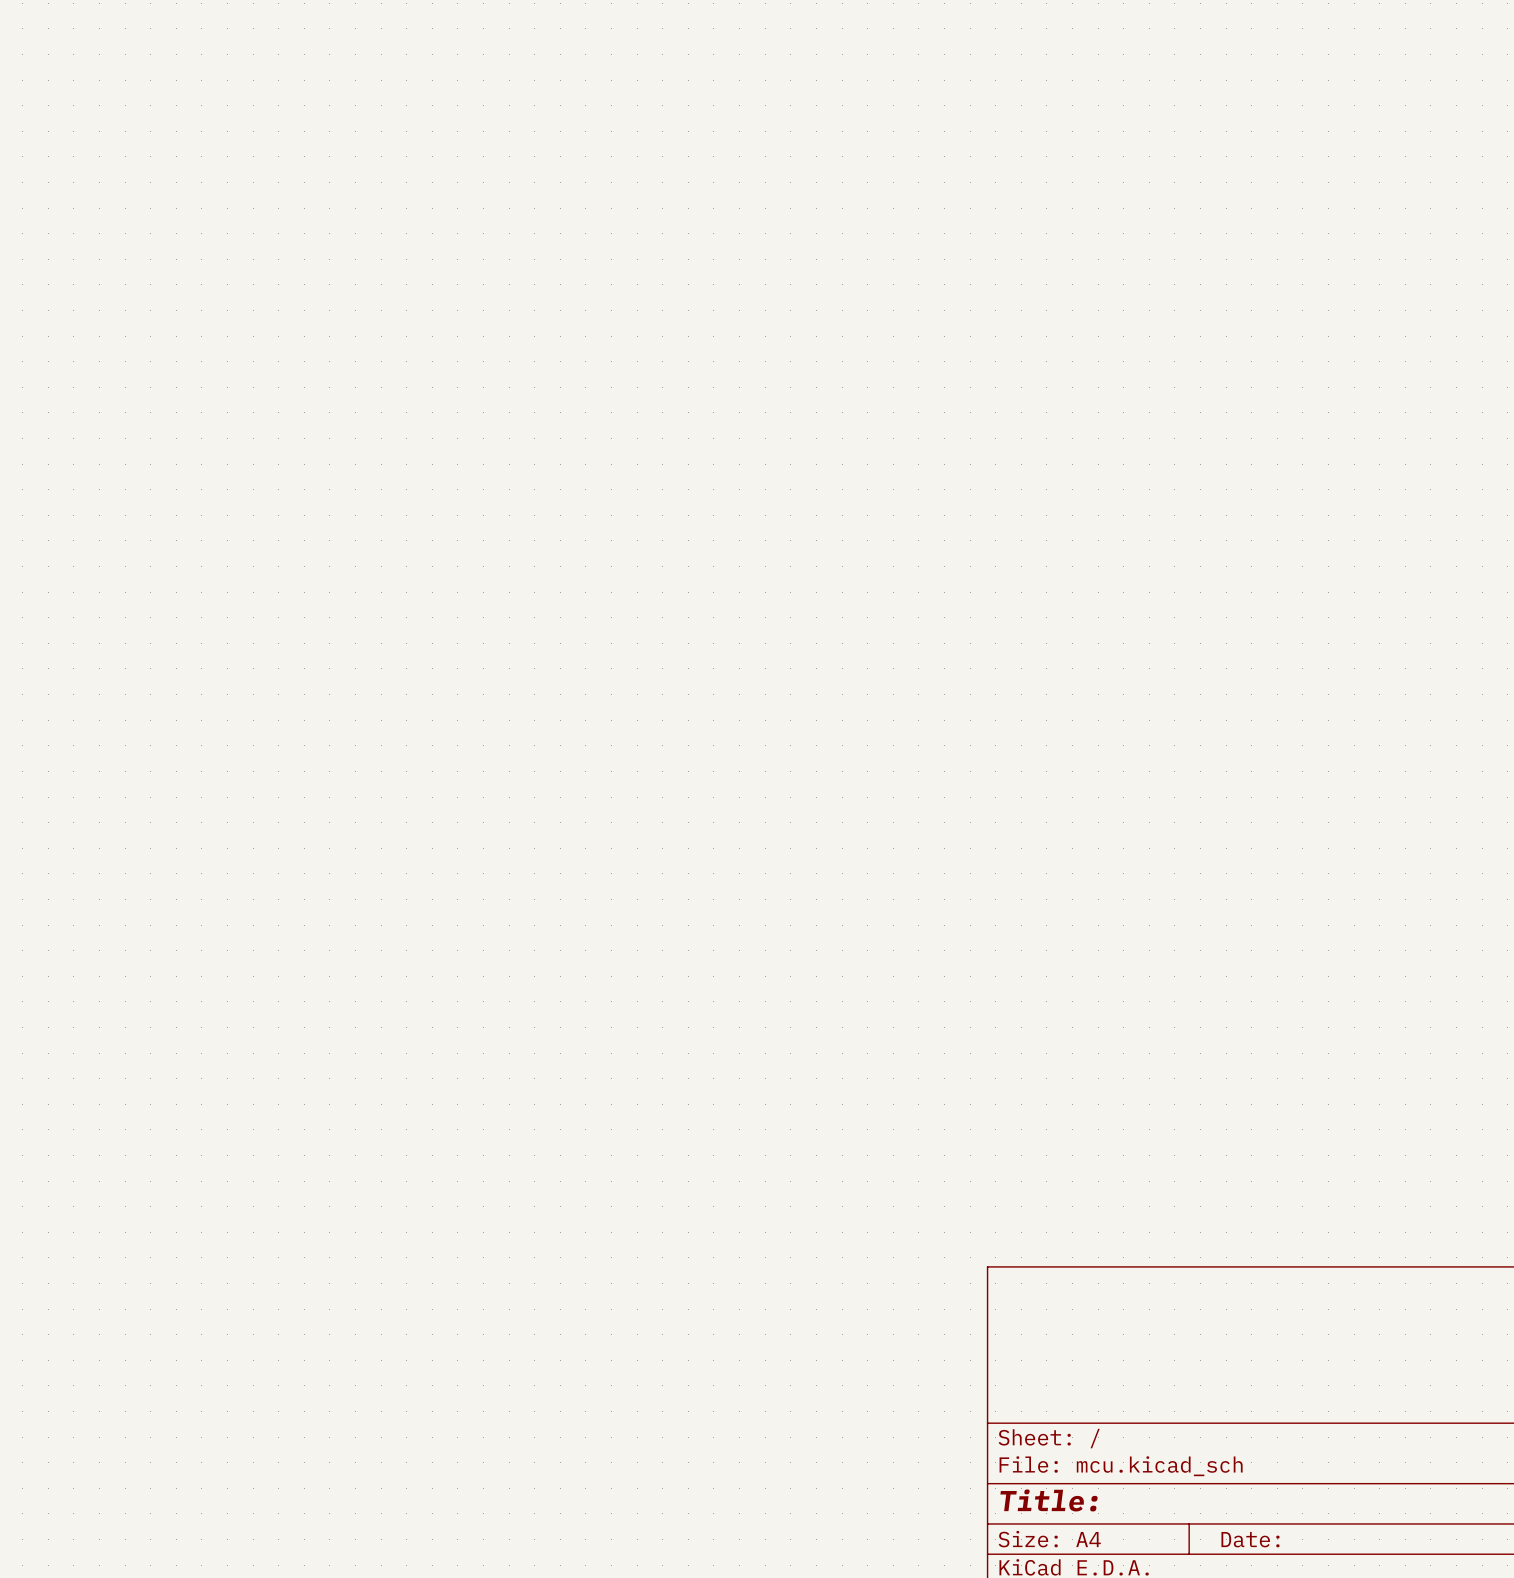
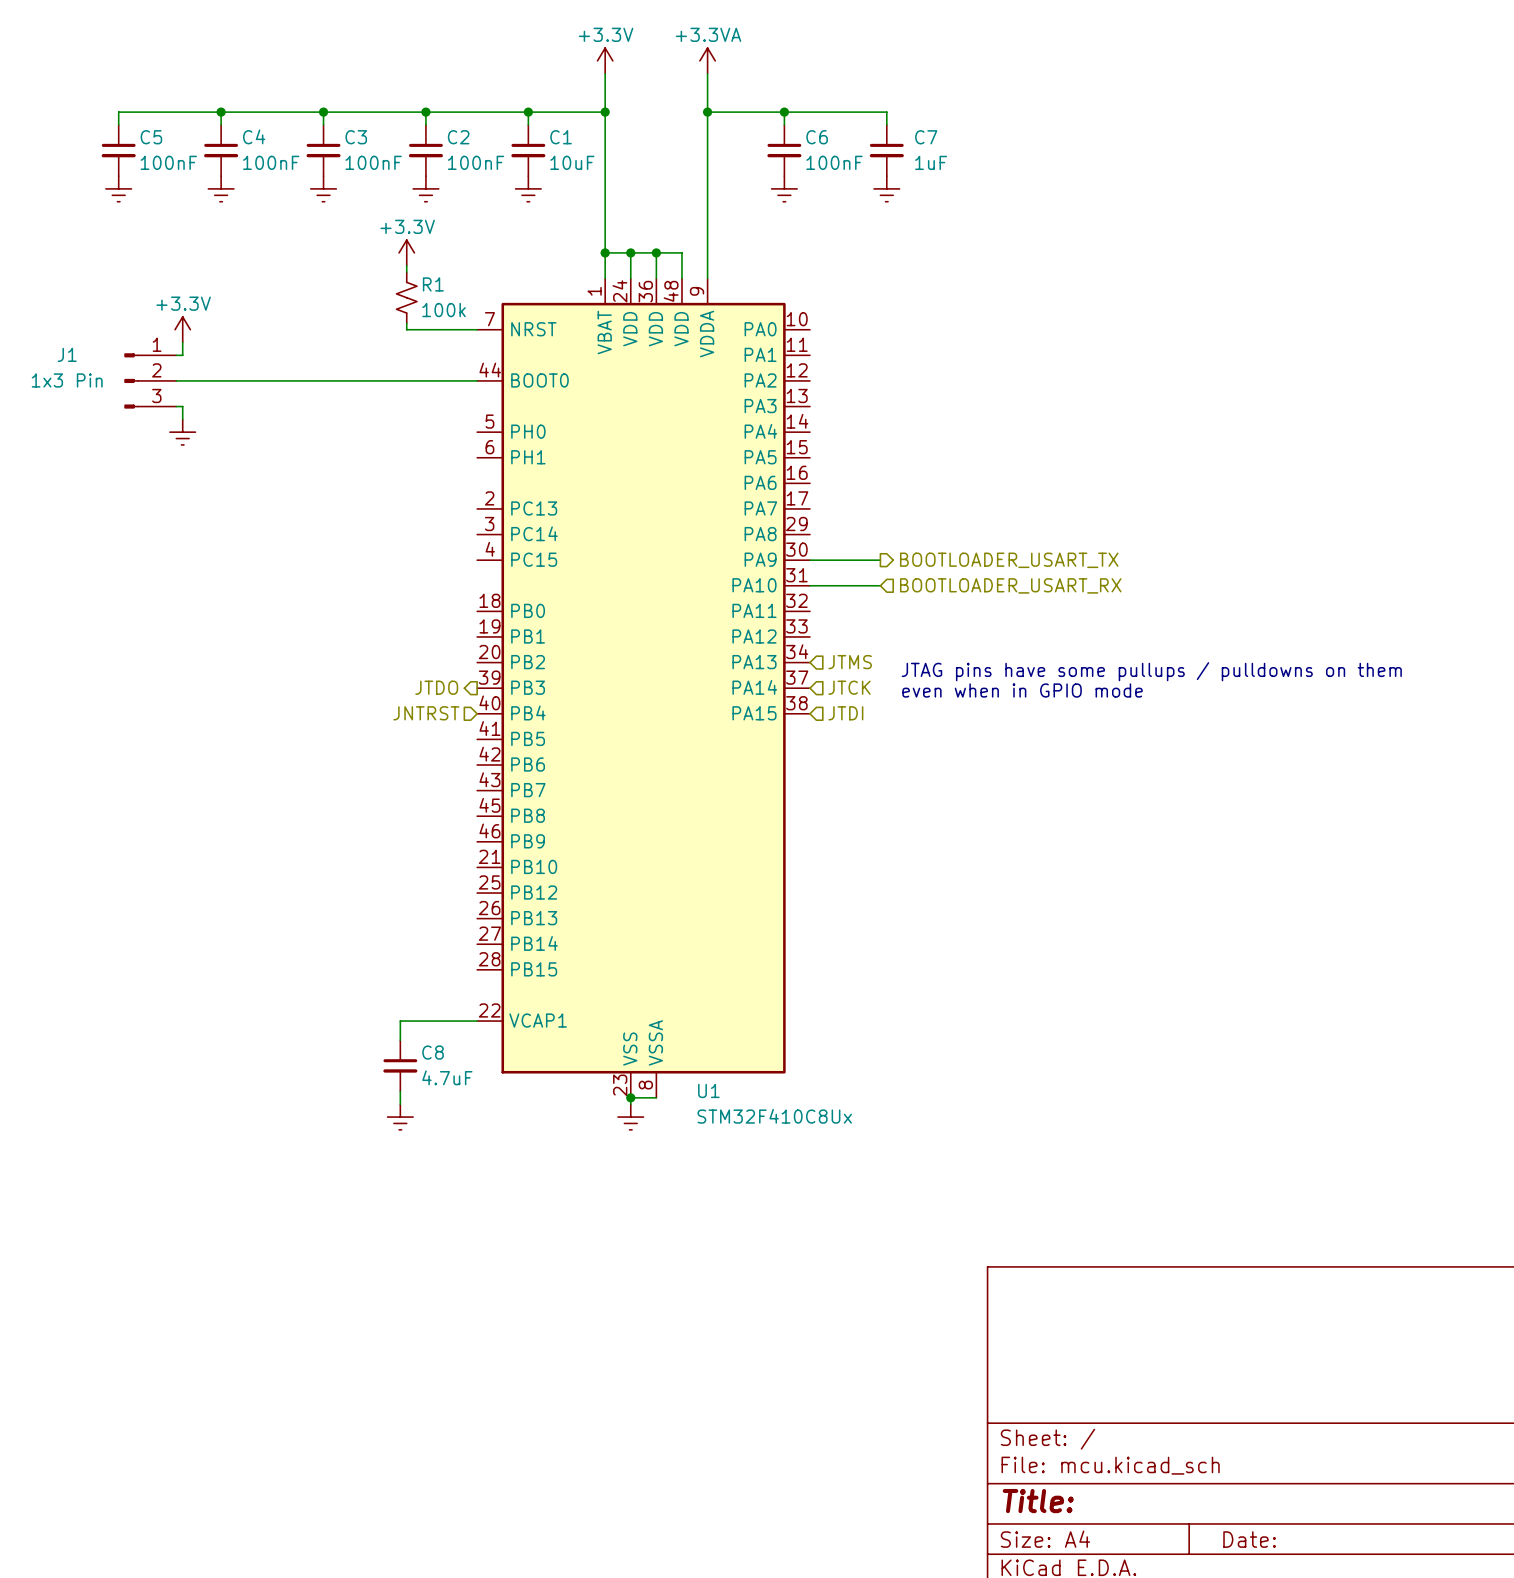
power symbol: none -> +3.3V (605, 60)
power symbol: none -> +3.3VA (707, 60)
wire: none -> (605, 73) (605, 278)
wire: none -> (707, 73) (707, 278)
wire: none -> (221, 112) (221, 124)
junction: none -> (221, 112)
wire: none -> (323, 112) (323, 124)
junction: none -> (323, 112)
wire: none -> (425, 112) (425, 124)
junction: none -> (425, 112)
wire: none -> (528, 112) (528, 124)
junction: none -> (528, 112)
wire: none -> (605, 112) (118, 112) (118, 124)
junction: none -> (605, 112)
wire: none -> (707, 112) (886, 112) (886, 124)
junction: none -> (707, 112)
wire: none -> (784, 112) (784, 124)
junction: none -> (784, 112)
C5: none -> 100nF (118, 150)
C4: none -> 100nF (221, 150)
C3: none -> 100nF (323, 150)
C2: none -> 100nF (425, 150)
C1: none -> 10uF (528, 150)
C6: none -> 100nF (784, 150)
C7: none -> 1uF (886, 150)
power symbol: none -> (118, 188)
power symbol: none -> (221, 188)
power symbol: none -> (323, 188)
power symbol: none -> (425, 188)
power symbol: none -> (528, 188)
power symbol: none -> (784, 188)
power symbol: none -> (886, 188)
power symbol: none -> +3.3V (406, 252)
wire: none -> (605, 252) (681, 252) (681, 278)
junction: none -> (605, 252)
wire: none -> (630, 252) (630, 278)
junction: none -> (630, 252)
wire: none -> (656, 252) (656, 278)
junction: none -> (656, 252)
wire: none -> (406, 265) (406, 272)
R1: none -> 100k (406, 297)
wire: none -> (406, 323) (406, 329) (477, 329)
power symbol: none -> +3.3V (182, 329)
wire: none -> (182, 342) (182, 355) (176, 355)
J1: none -> 1x3 Pin (150, 380)
wire: none -> (176, 380) (477, 380)
wire: none -> (176, 406) (182, 406) (182, 419)
power symbol: none -> (182, 432)
wire: none -> (810, 560) (880, 560)
hierarchical label: none -> BOOTLOADER_USART_TX (1009, 560)
wire: none -> (810, 585) (880, 585)
hierarchical label: none -> BOOTLOADER_USART_RX (1010, 585)
hierarchical label: none -> JTMS (850, 662)
text: none -> JTAG pins have some pullups / pulldowns on them (1151, 671)
hierarchical label: none -> JTDO (436, 687)
hierarchical label: none -> JTCK (849, 687)
U1: none -> STM32F410C8Ux (643, 688)
text: none -> even when in GPIO mode (1022, 690)
hierarchical label: none -> JNTRST (426, 713)
hierarchical label: none -> JTDI (845, 713)
wire: none -> (477, 1021) (400, 1021) (400, 1040)
C8: none -> 4.7uF (400, 1065)
wire: none -> (400, 1091) (400, 1104)
junction: none -> (630, 1097)
wire: none -> (656, 1097) (630, 1097) (630, 1104)
power symbol: none -> (400, 1117)
power symbol: none -> (630, 1117)

